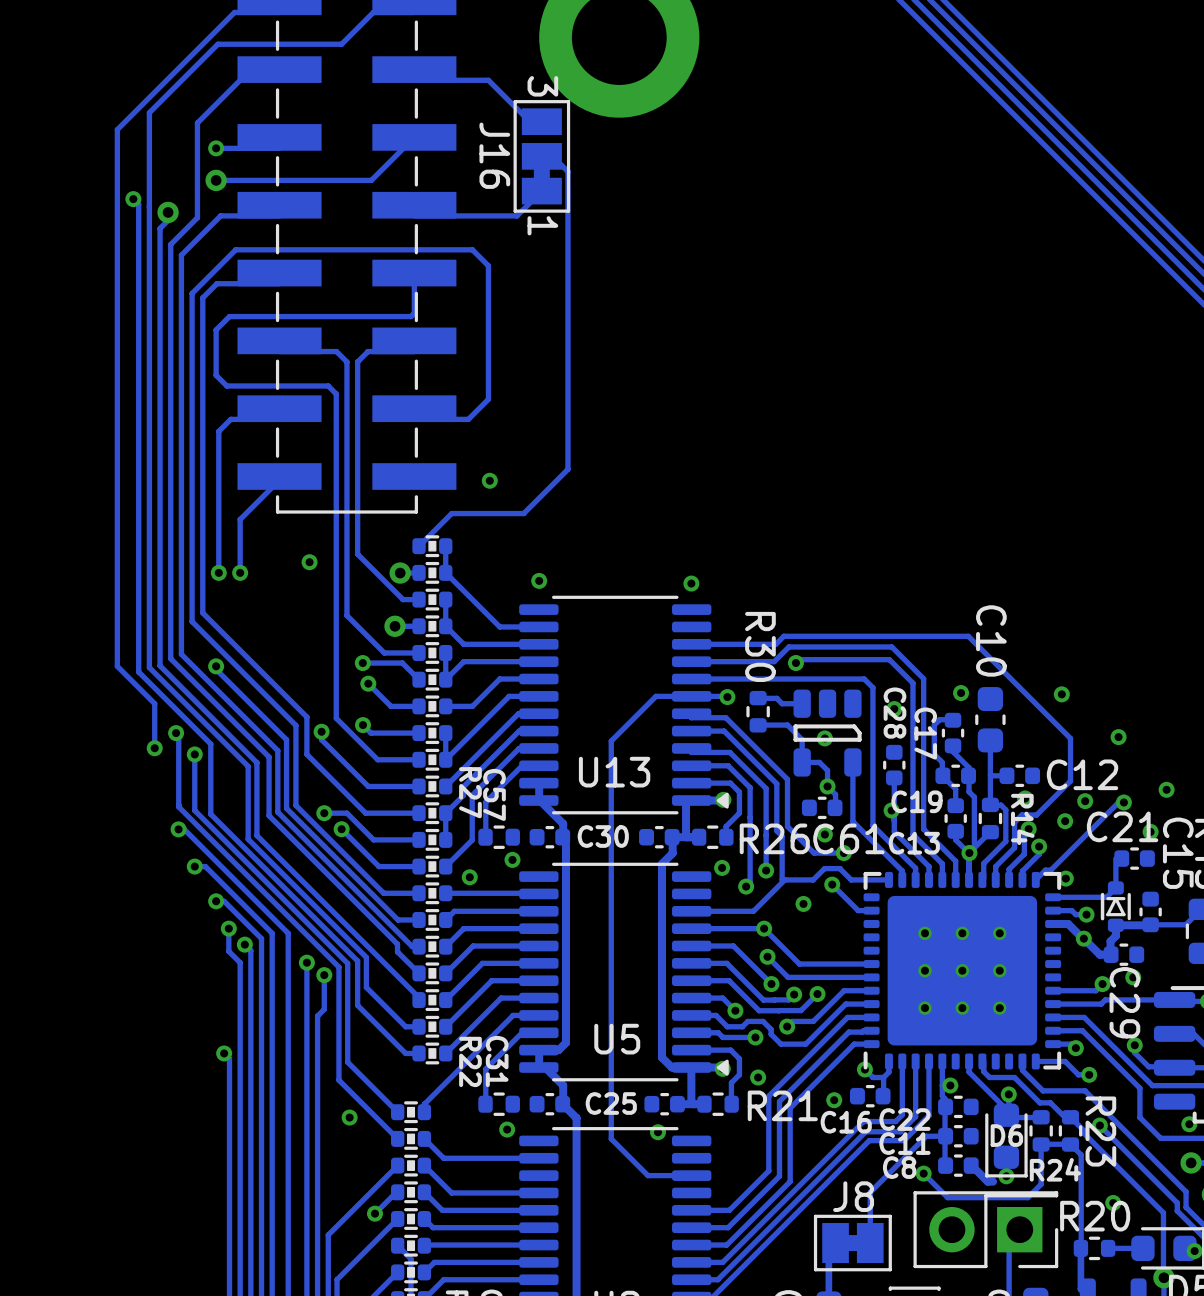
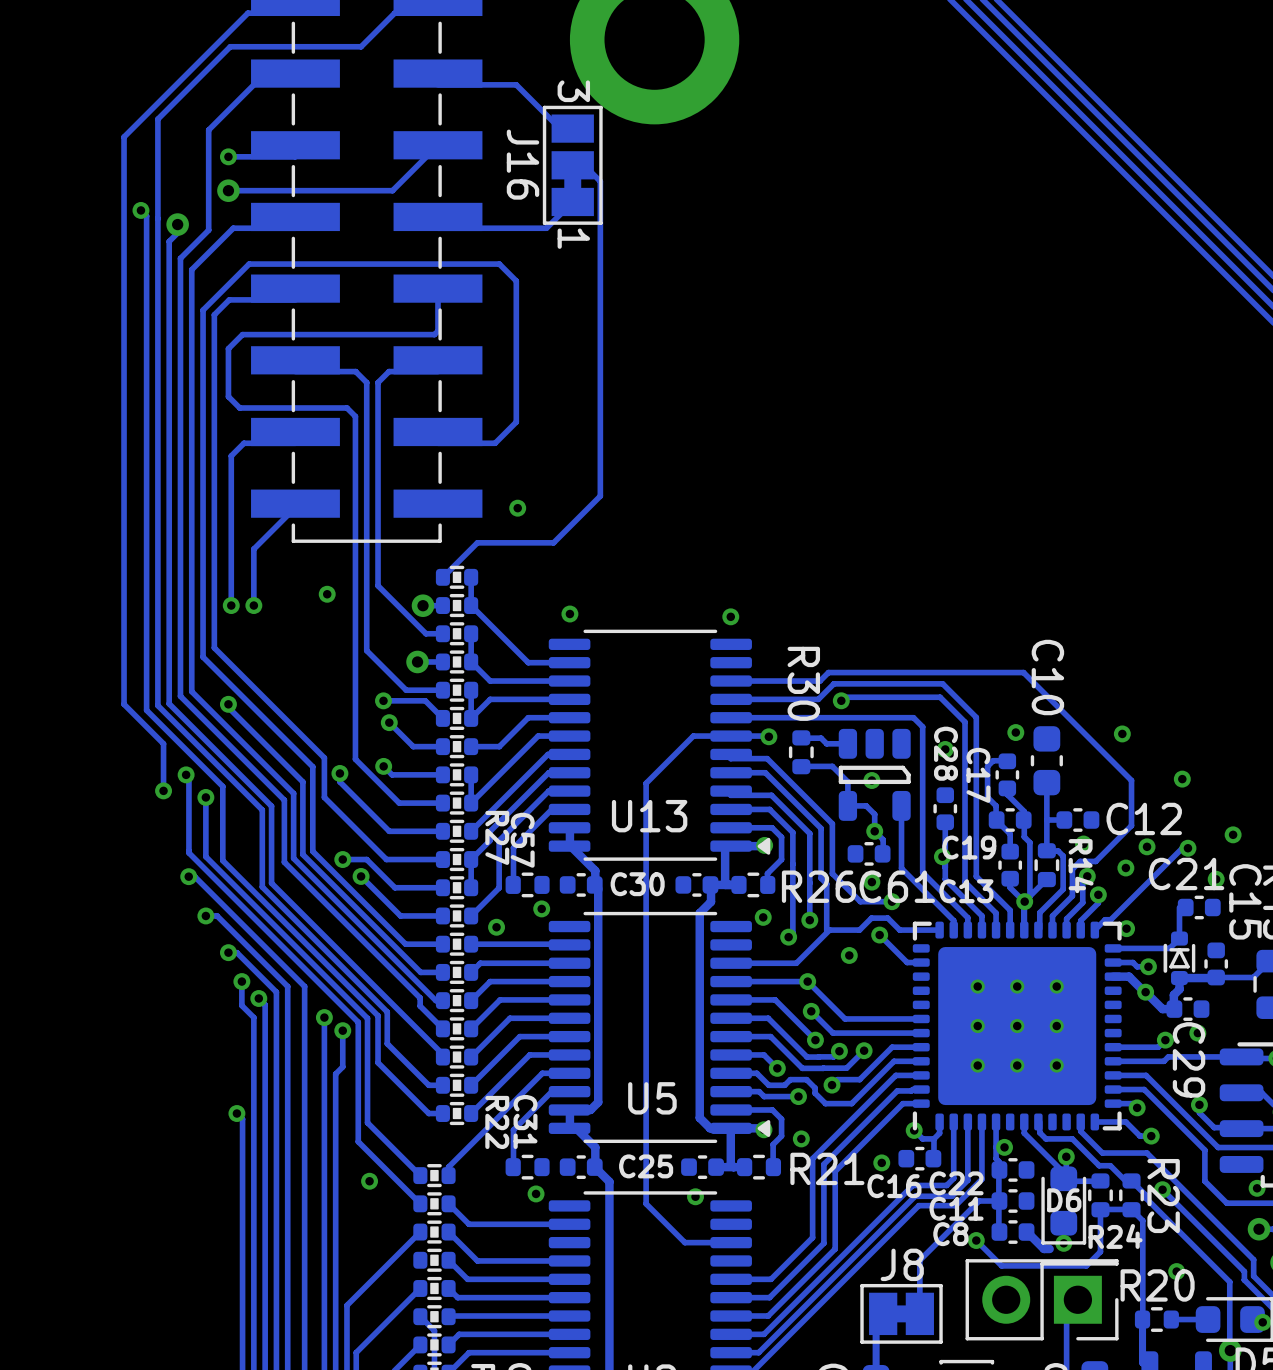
track: (397, 1192) (374, 1213) -> none
via: (374, 1213) -> none

